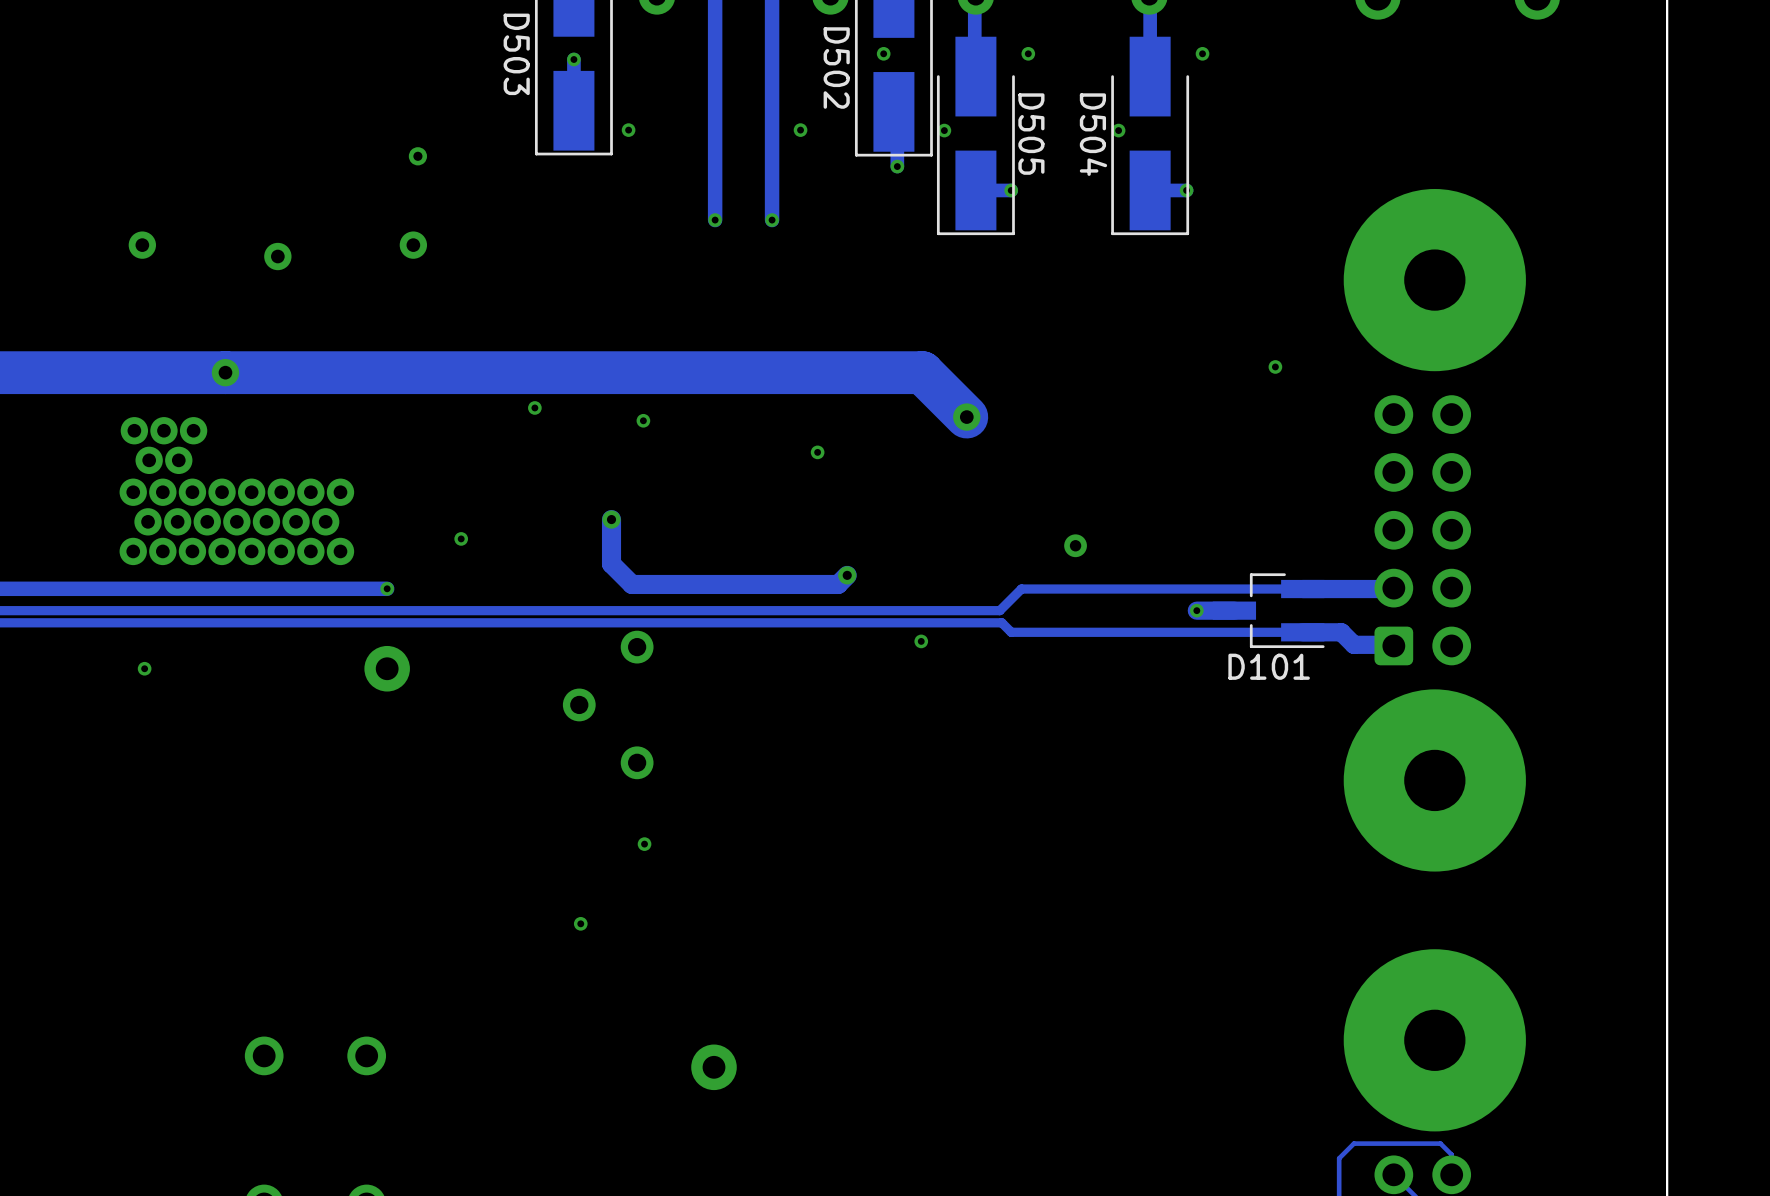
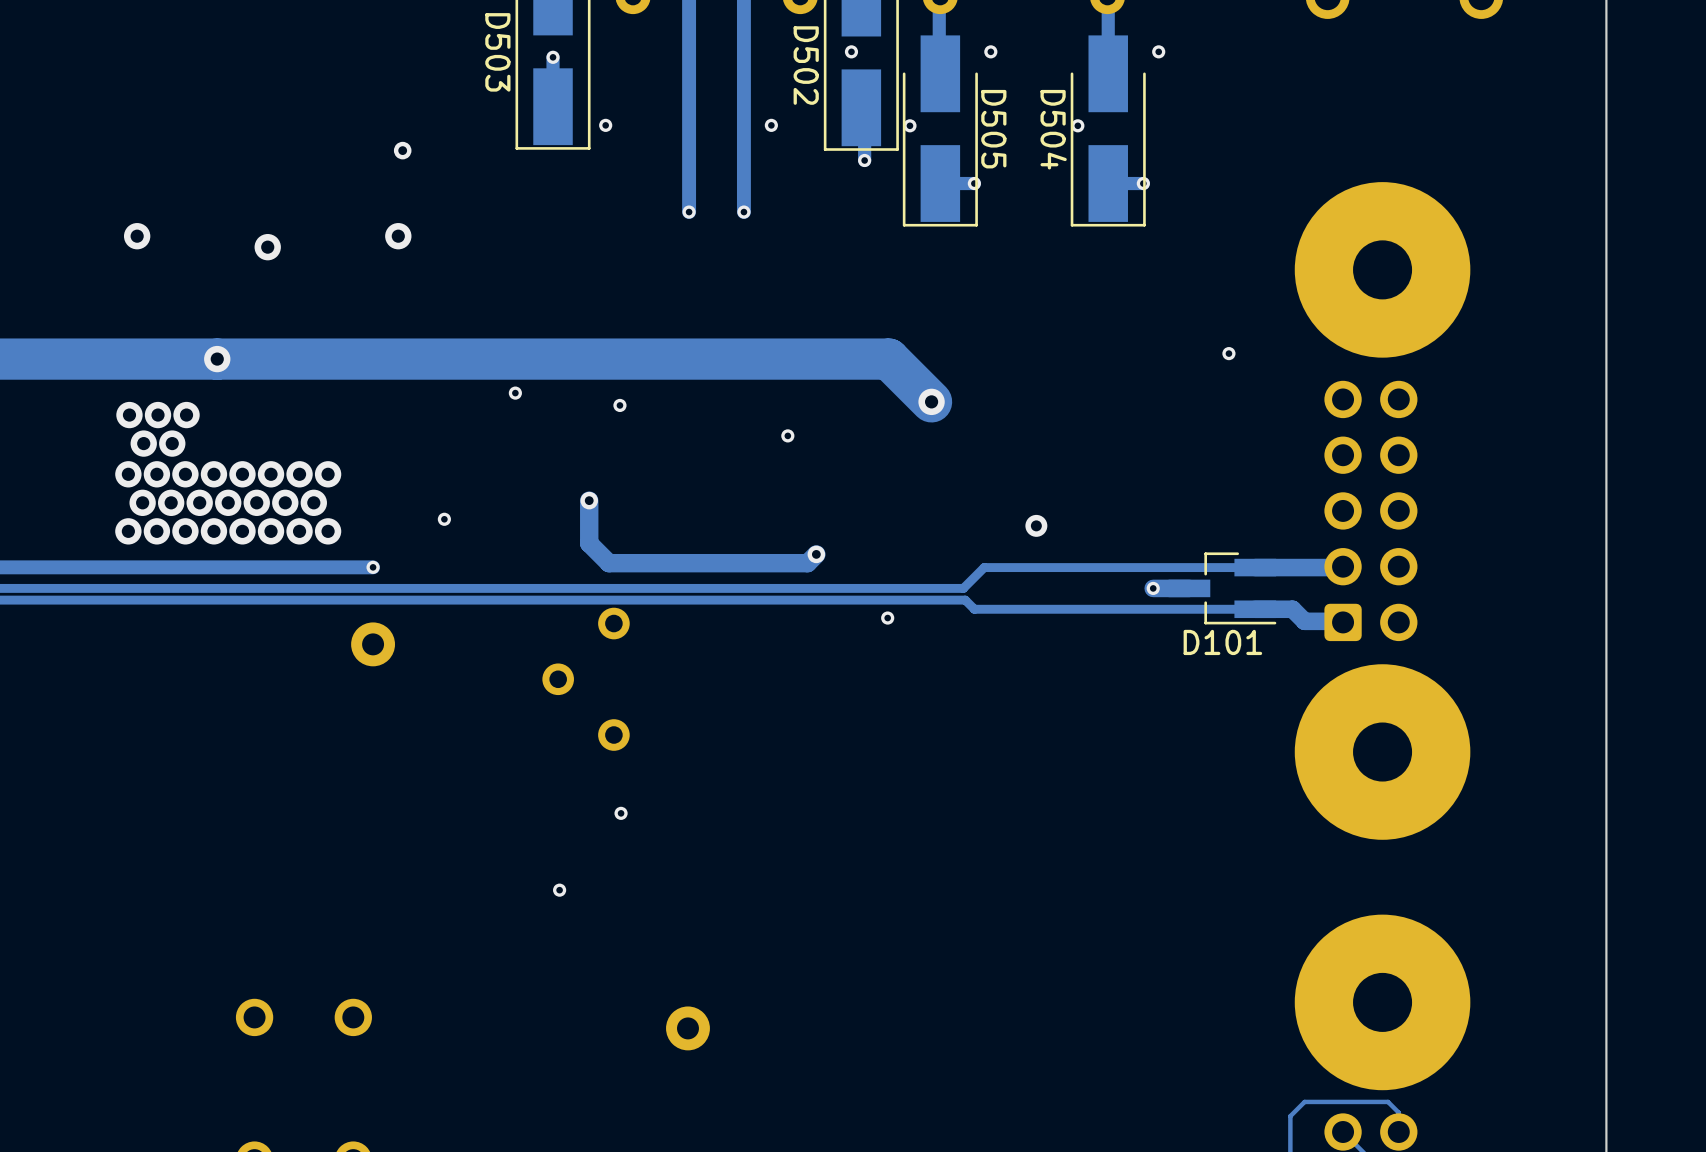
via: (144, 668) -> none

